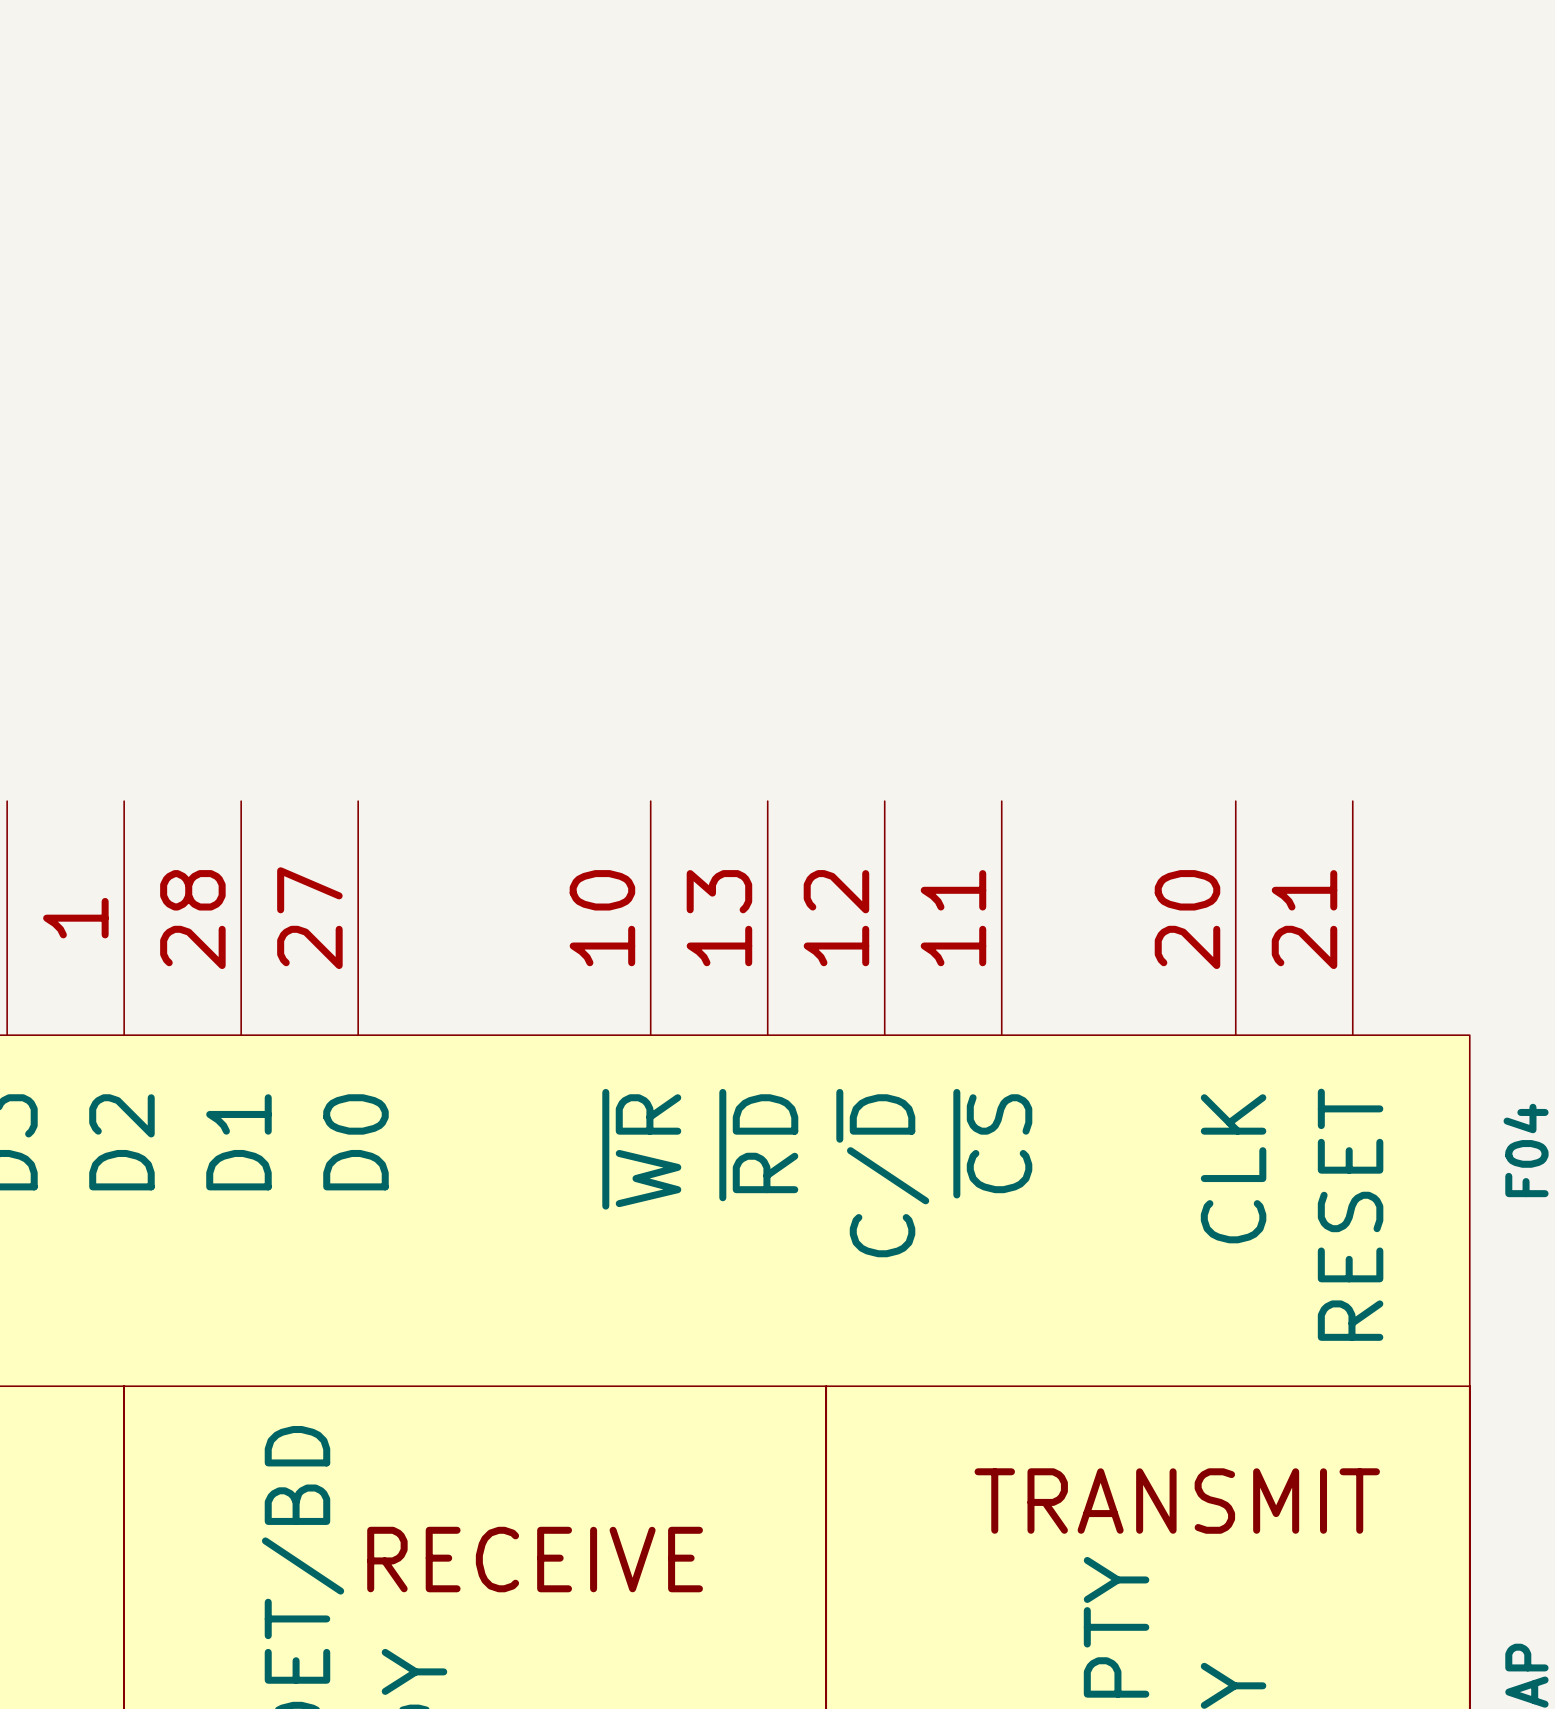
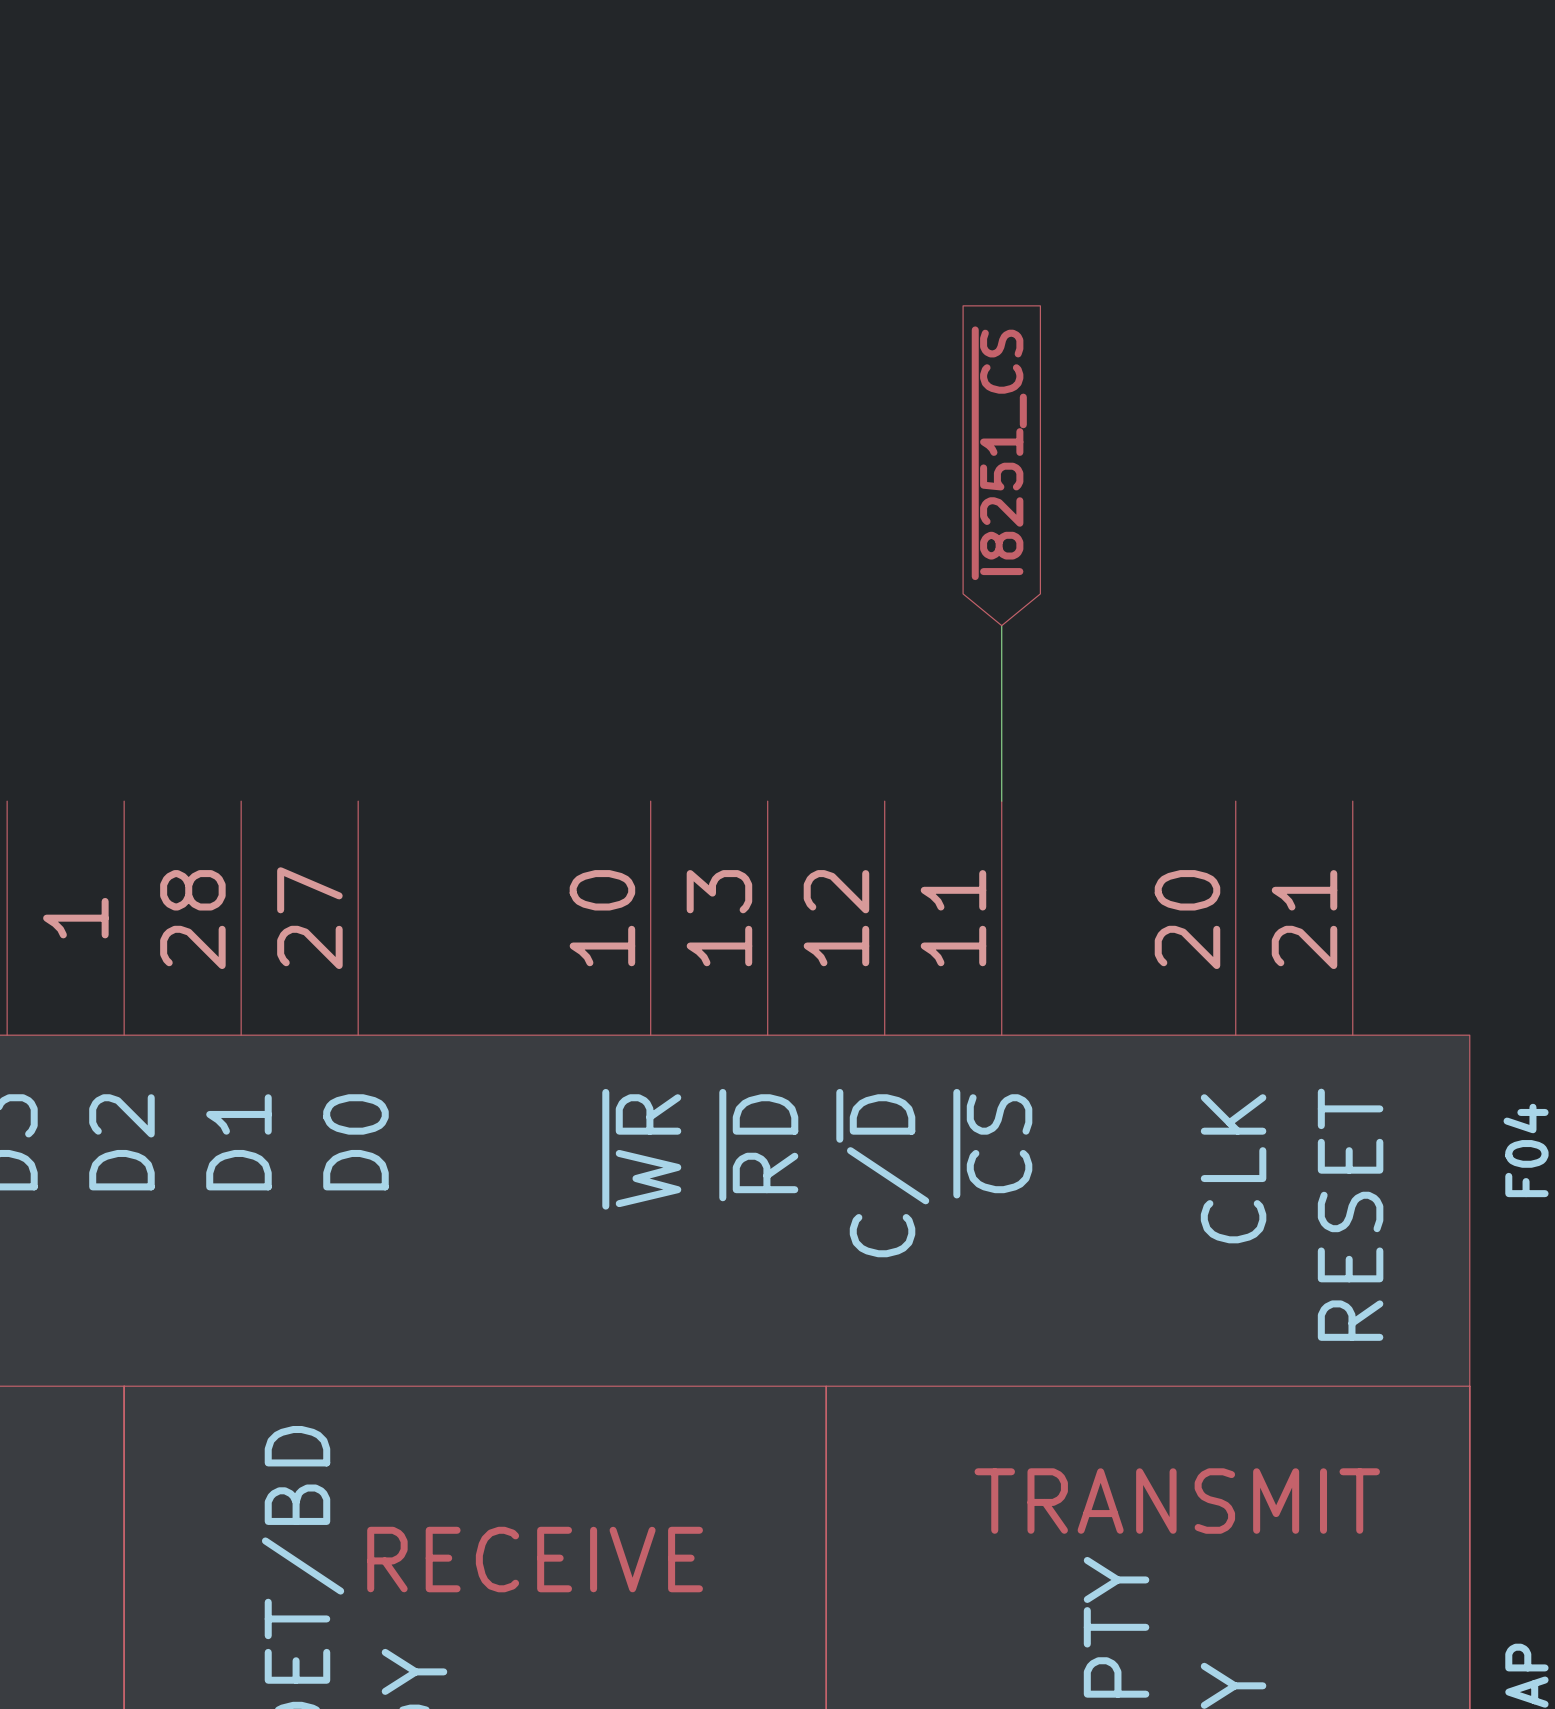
global label: none -> ~{I8251_CS} (999, 453)
wire: none -> (1001, 625) (1001, 801)

